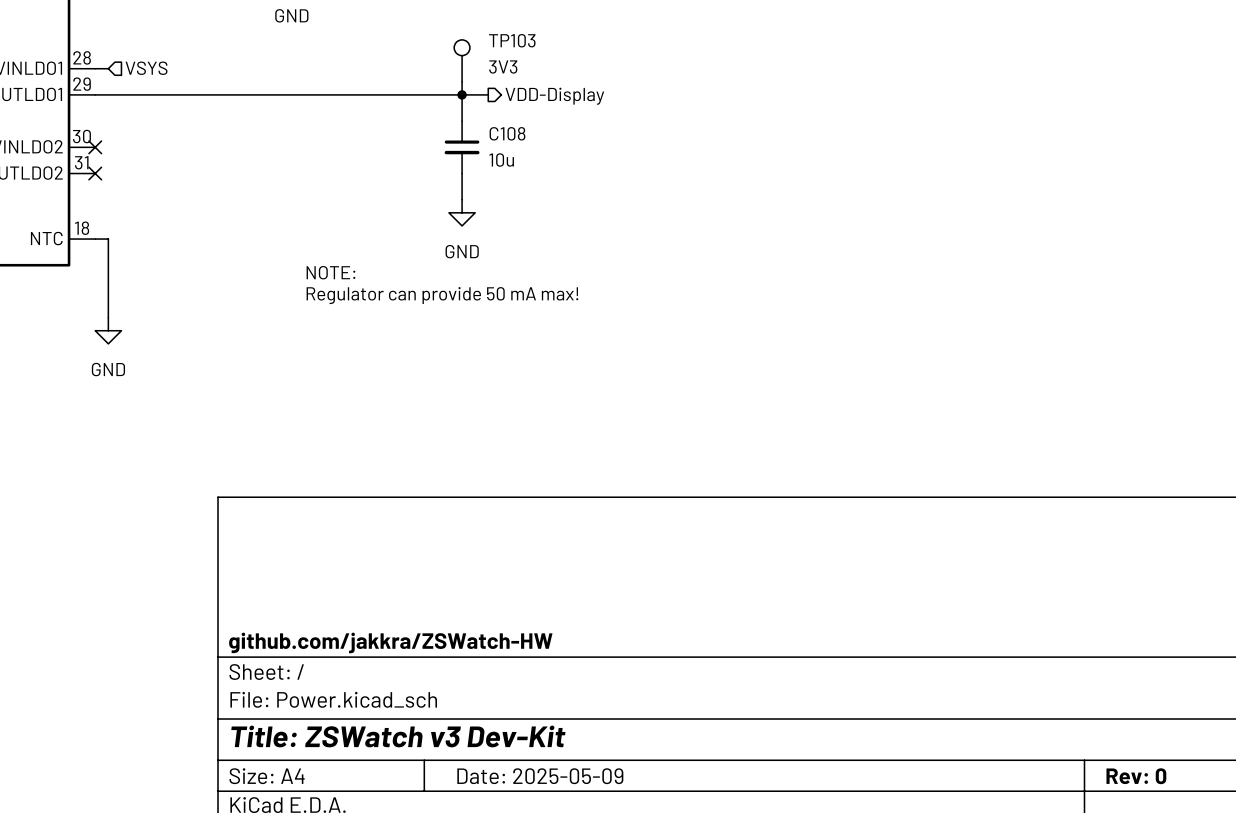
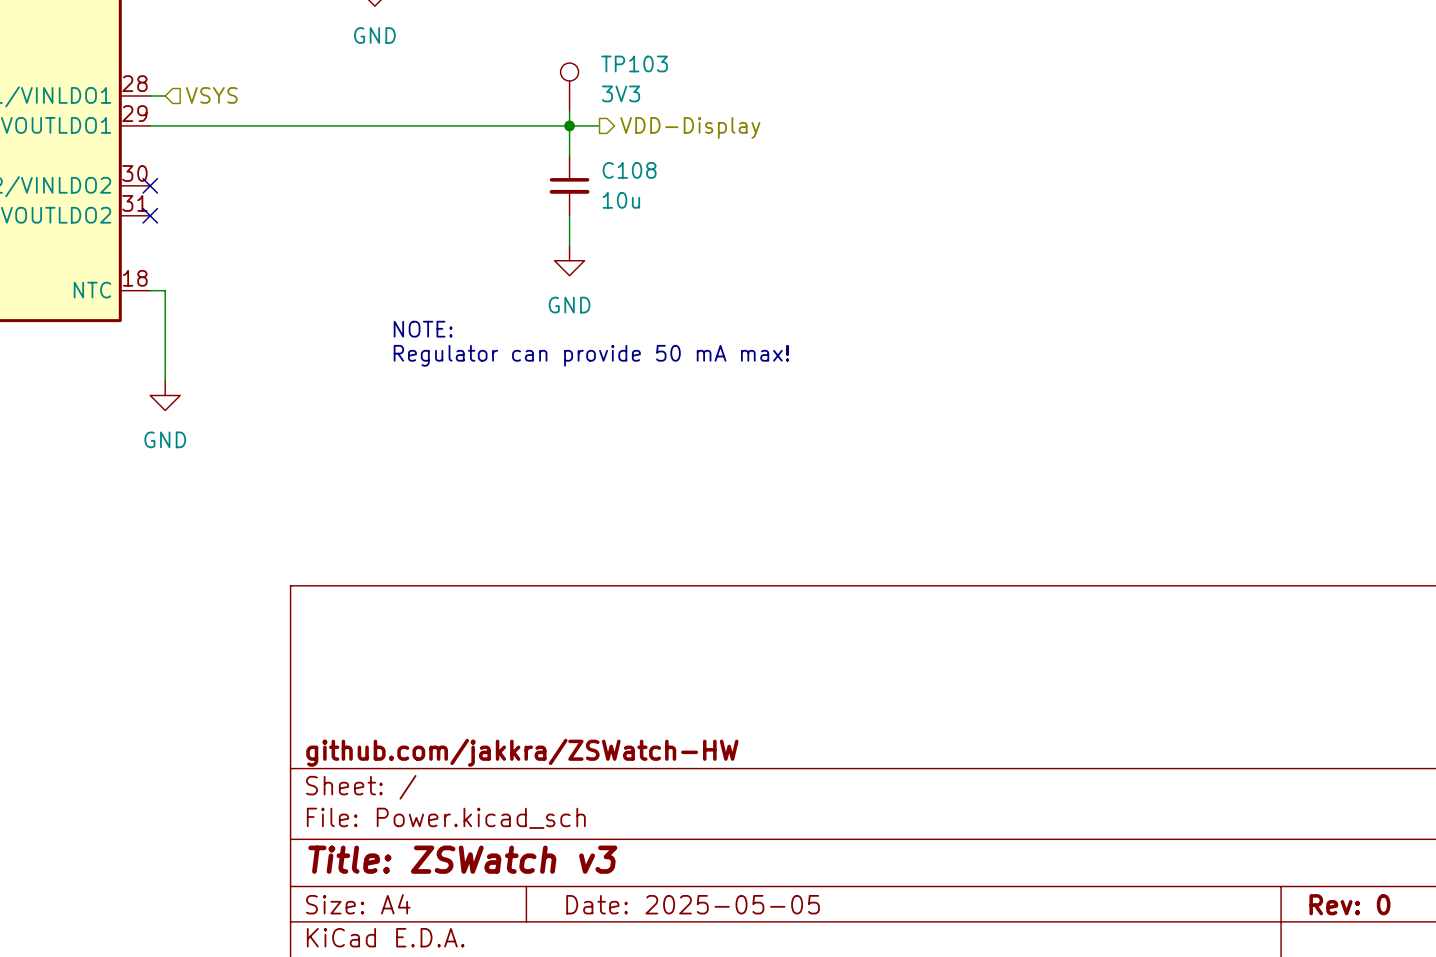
title block: Title: ZSWatch v3 Dev-Kit (398, 736) -> Title: ZSWatch v3 (462, 859)
title block: Date: 2025-05-09 (540, 776) -> Date: 2025-05-05 (693, 904)

